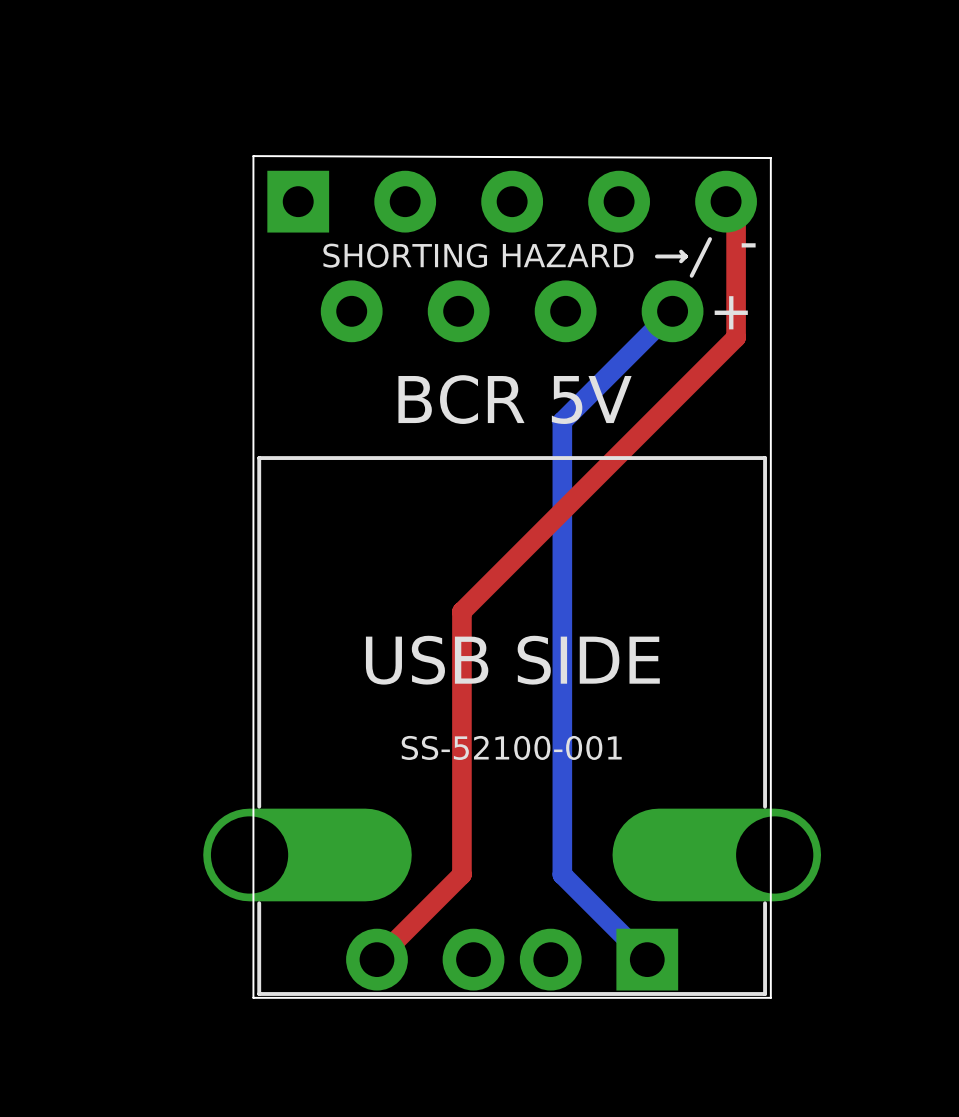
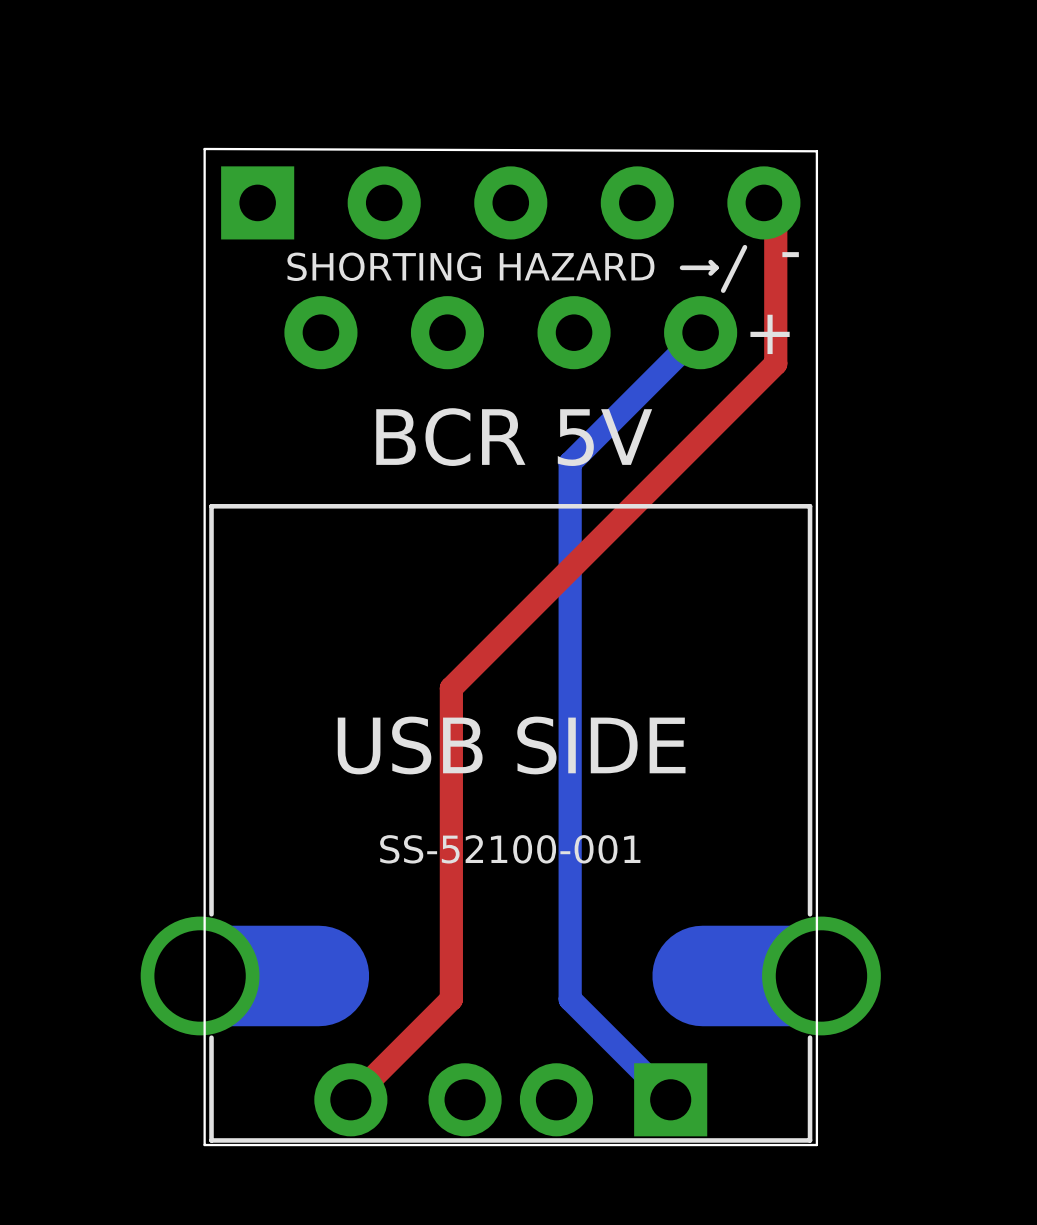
part footprint: [203, 456, 822, 996] -> [140, 504, 881, 1143]

